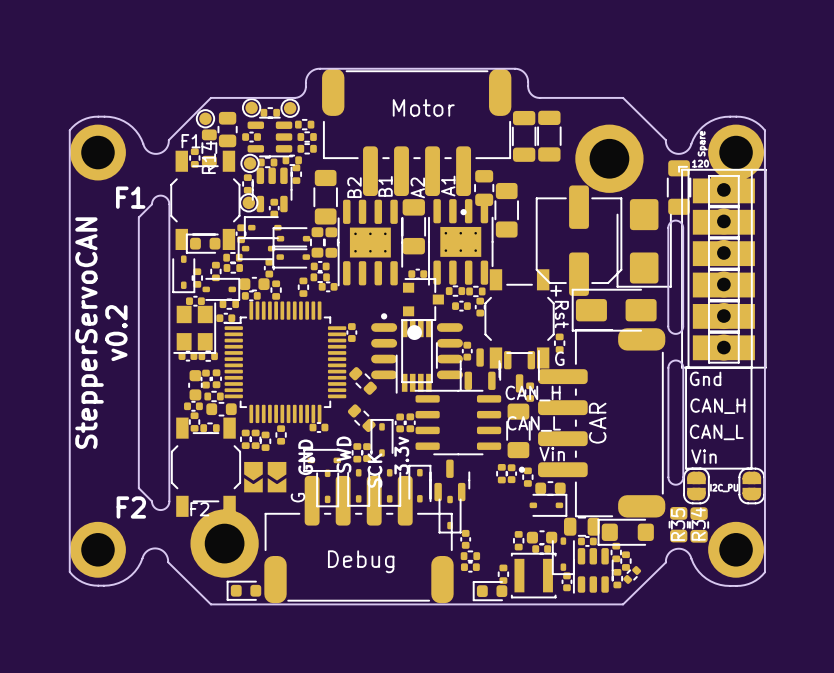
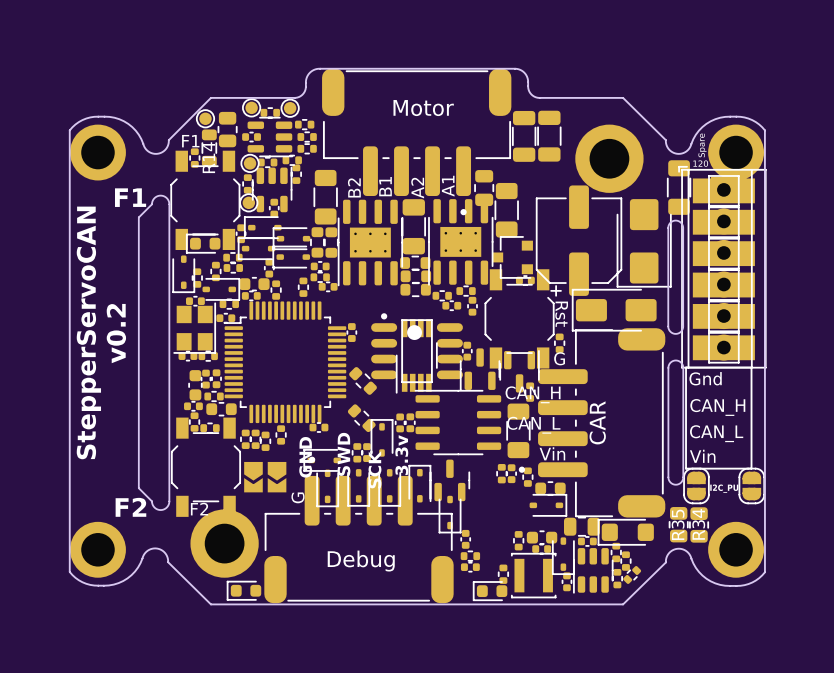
part: none -> (415, 263)
part footprint: [408, 268, 428, 280] -> [400, 269, 432, 284]
part: none -> (525, 280)
part: none -> (415, 289)
part: (455, 291) -> none
part: none -> (466, 291)
part: (475, 291) -> none
part: none -> (442, 295)
part rotation: 0° (423, 299) -> 180° (512, 257)
part position: (423, 299) -> (512, 257)
part: none -> (451, 305)
part: (461, 306) -> none
part: none -> (472, 306)
part: (480, 307) -> none

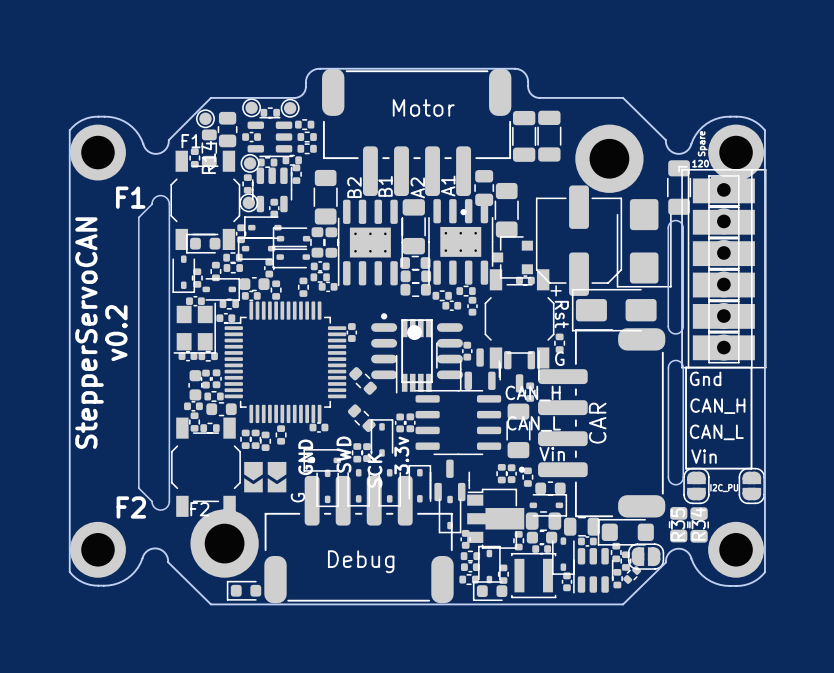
part: none -> (495, 518)
part: none -> (543, 521)
part: none -> (646, 556)
part: none -> (489, 564)
part: none -> (469, 579)

